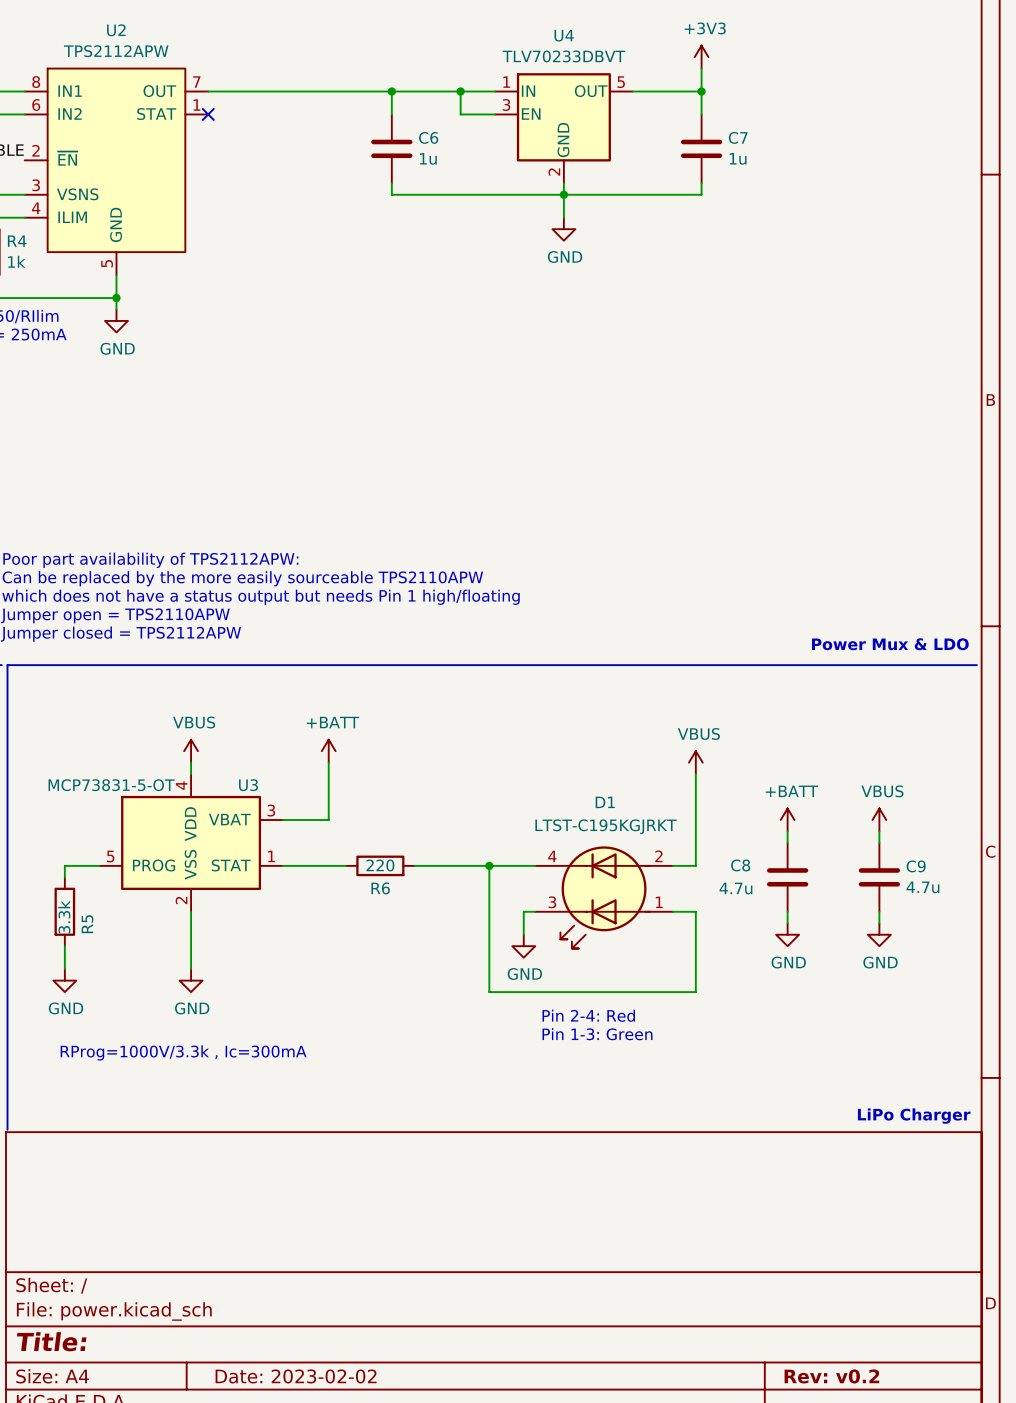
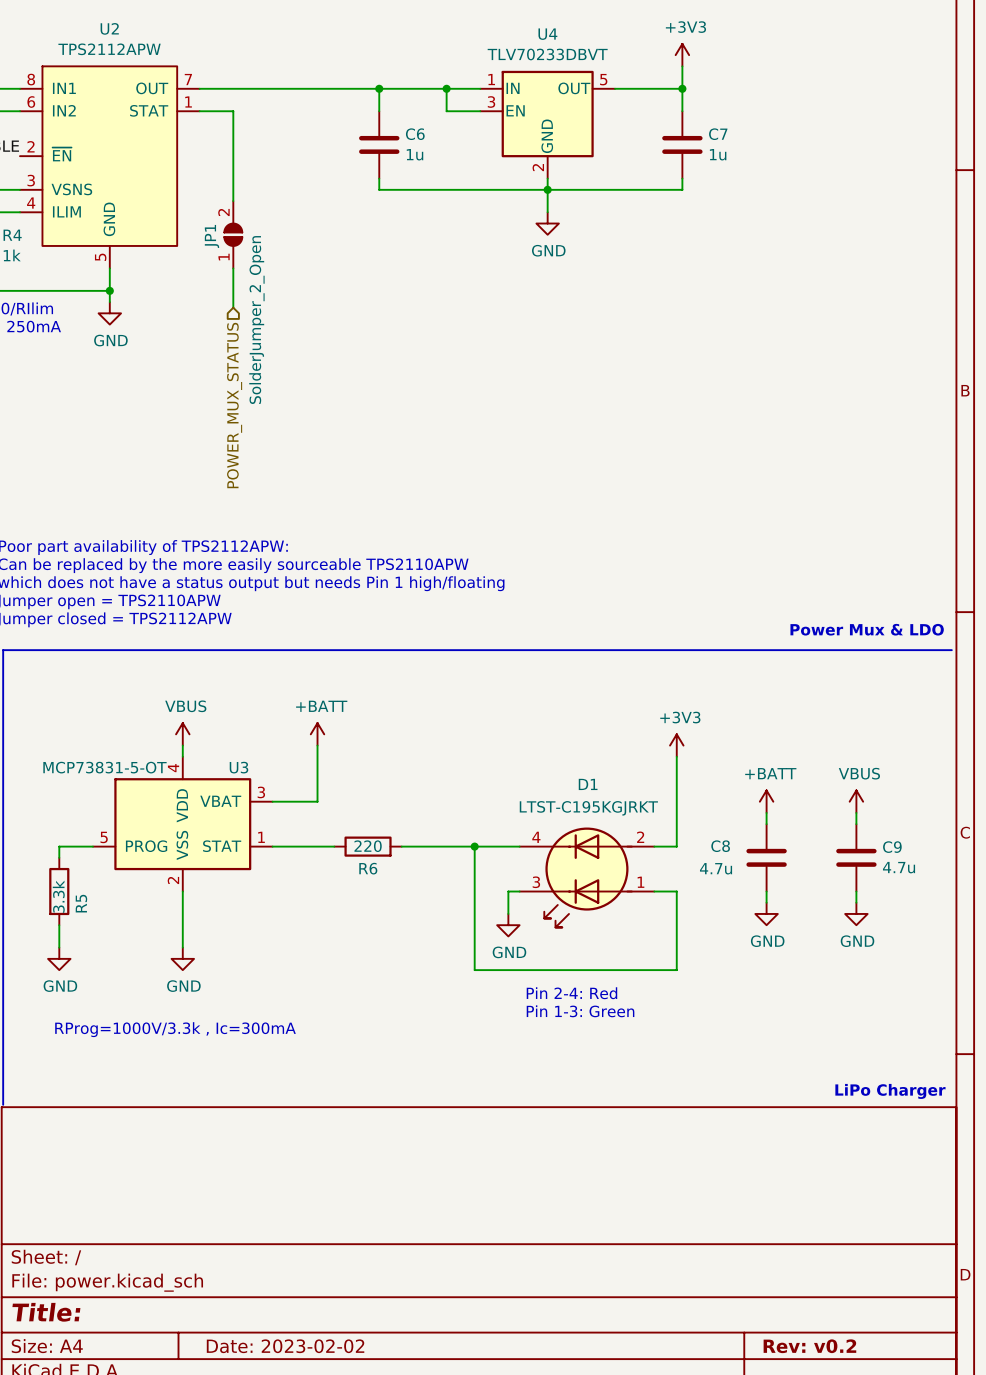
wire: none -> (199, 111) (233, 111) (233, 201)
no-connect mark: (208, 114) -> none
JP1: none -> SolderJumper_2_Open (233, 234)
wire: none -> (233, 268) (233, 307)
hierarchical label: none -> POWER_MUX_STATUS (234, 405)
power symbol: VBUS (695, 762) -> +3V3 (676, 745)

